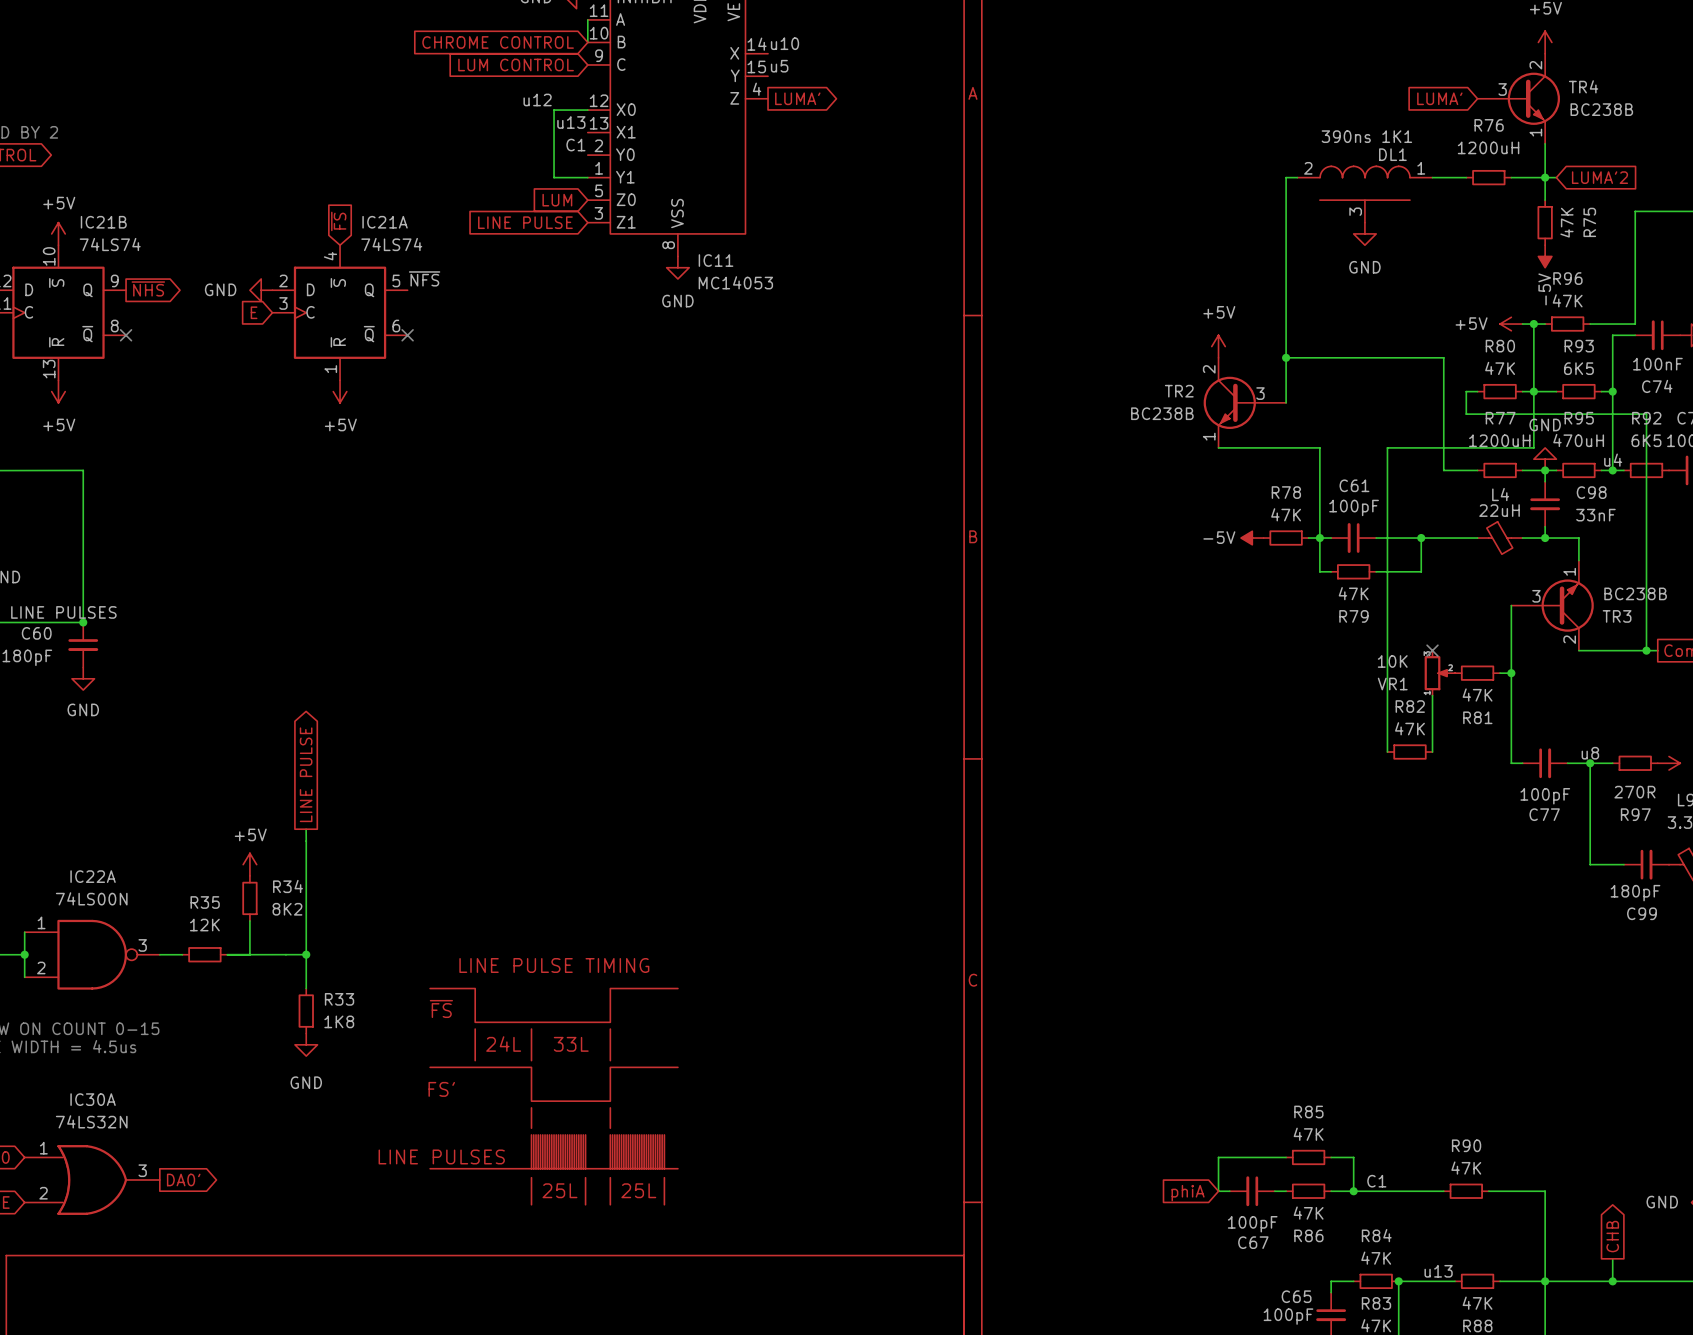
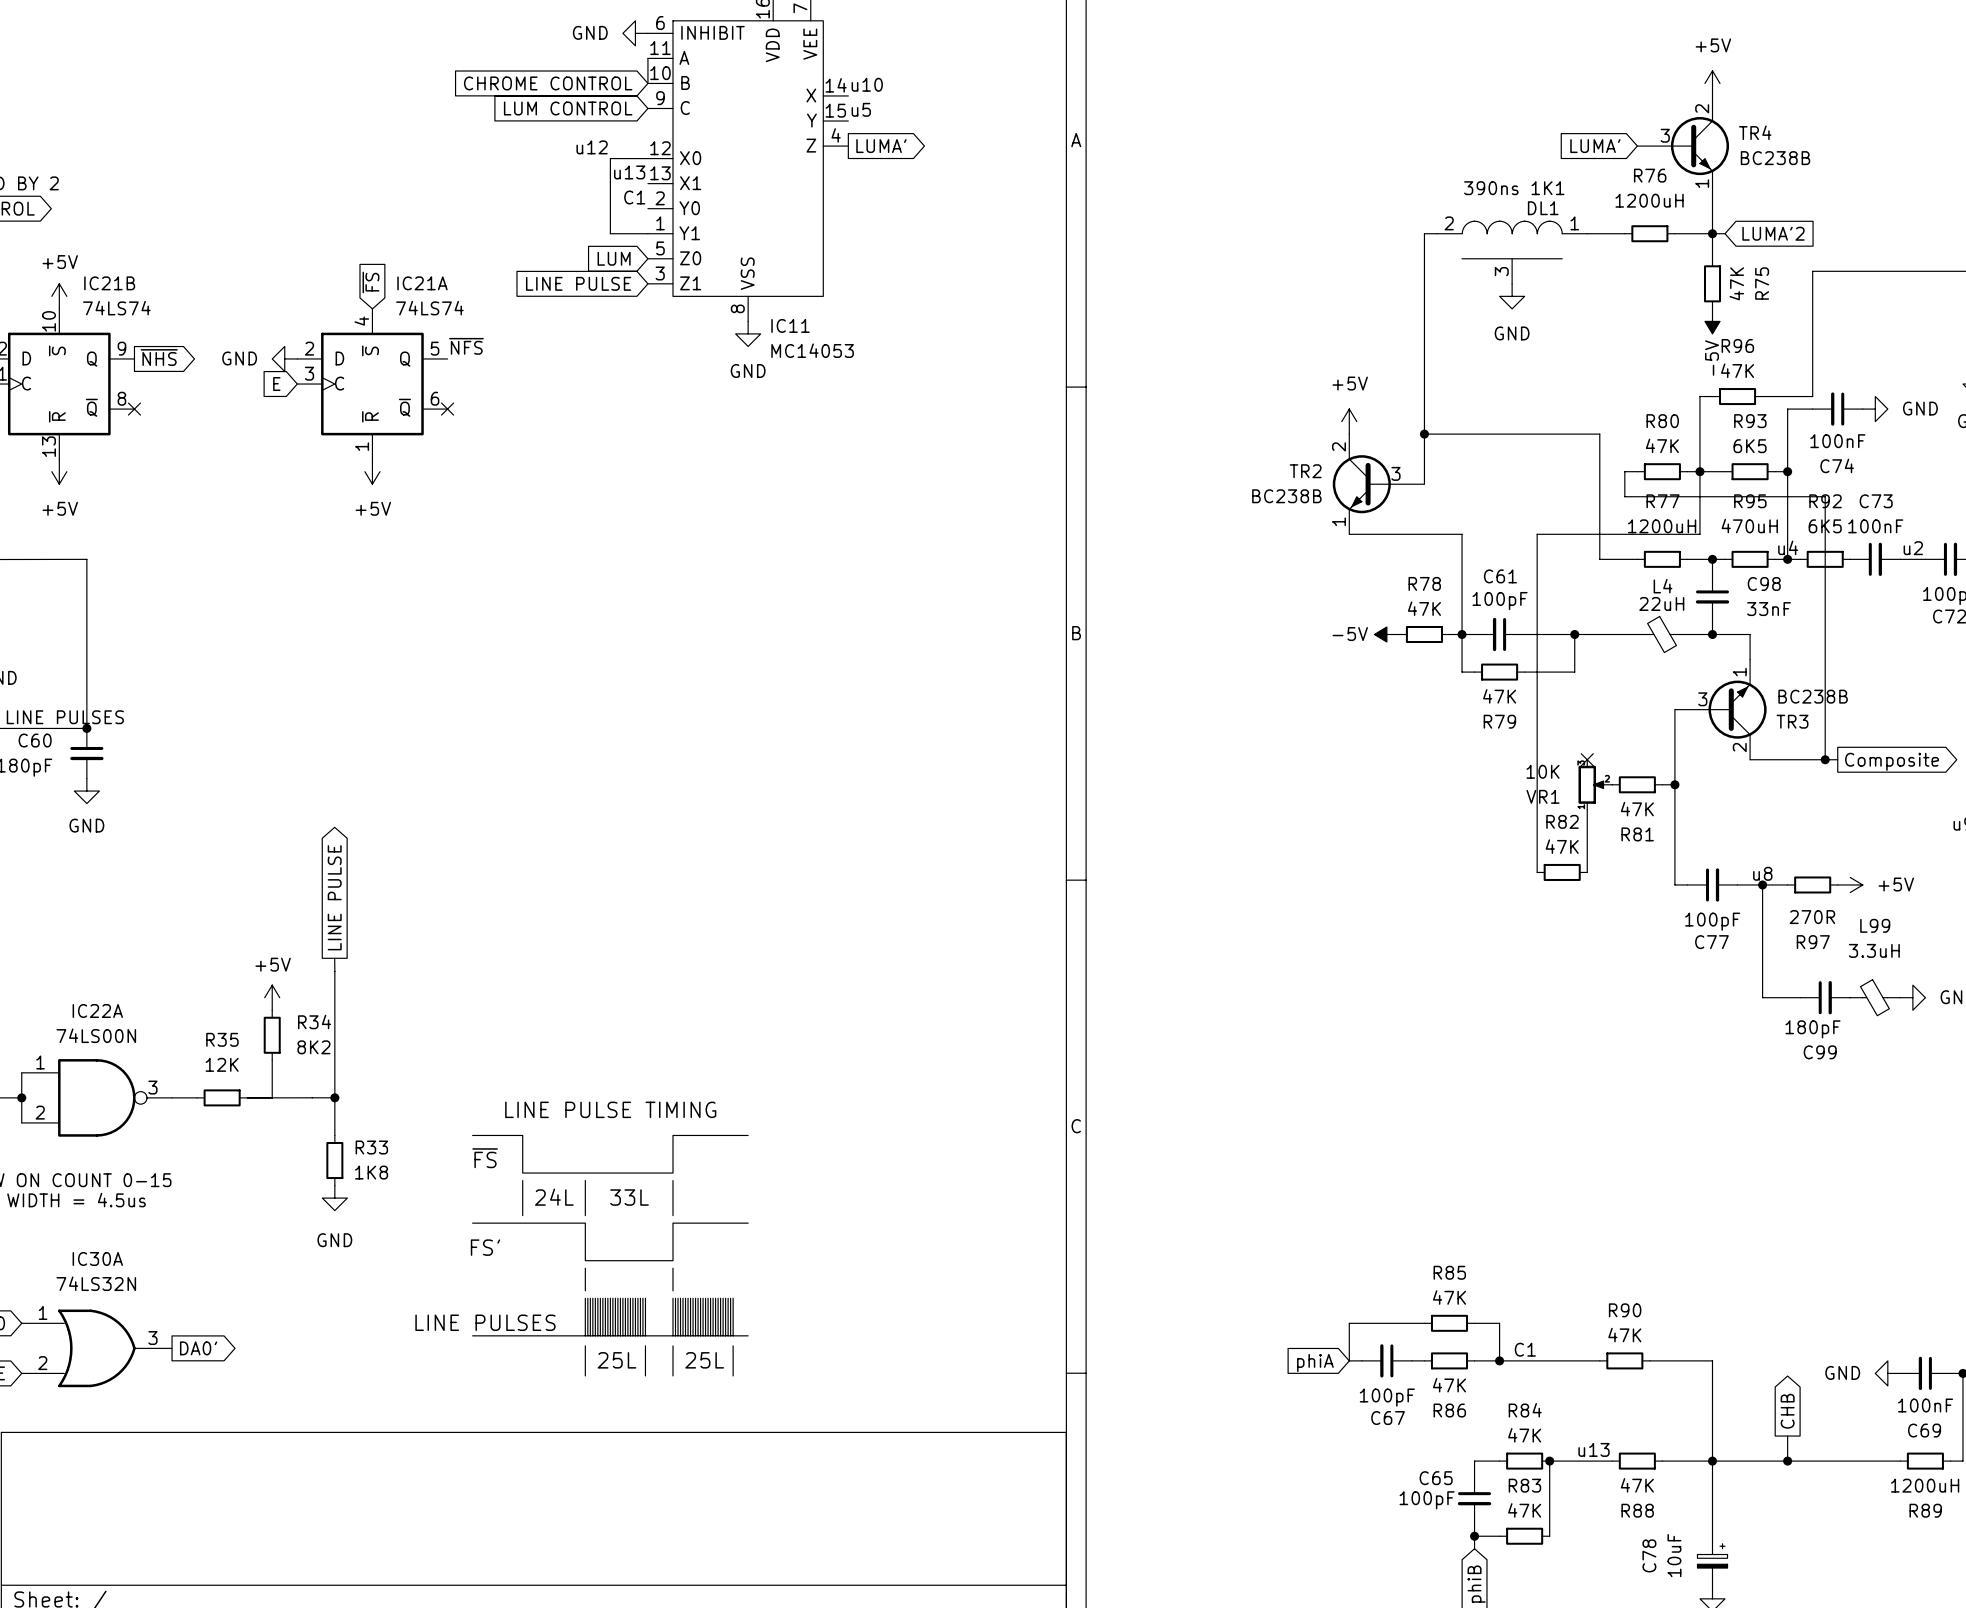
power symbol: +5V (1511, 324) -> none
wire: (1522, 324) (1533, 324) -> none
junction: (1533, 324) -> none
power symbol: GND (1545, 459) -> none

